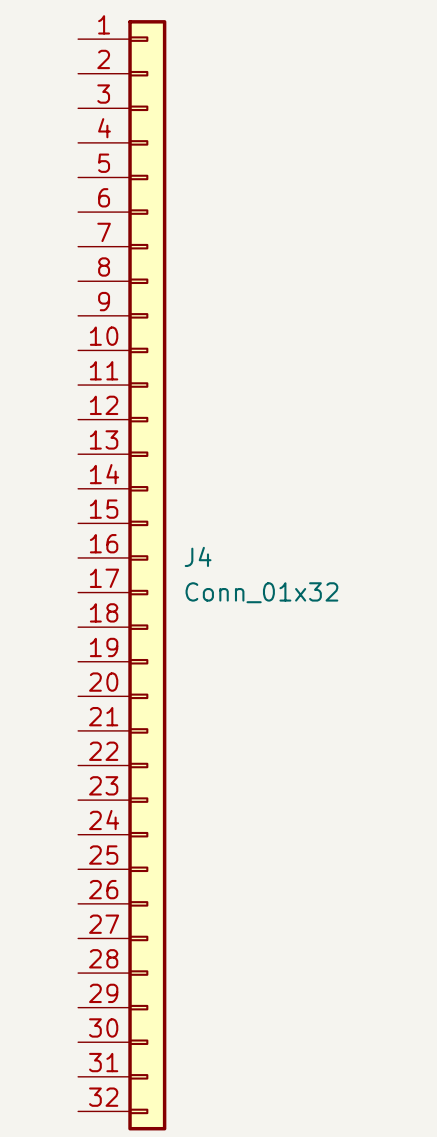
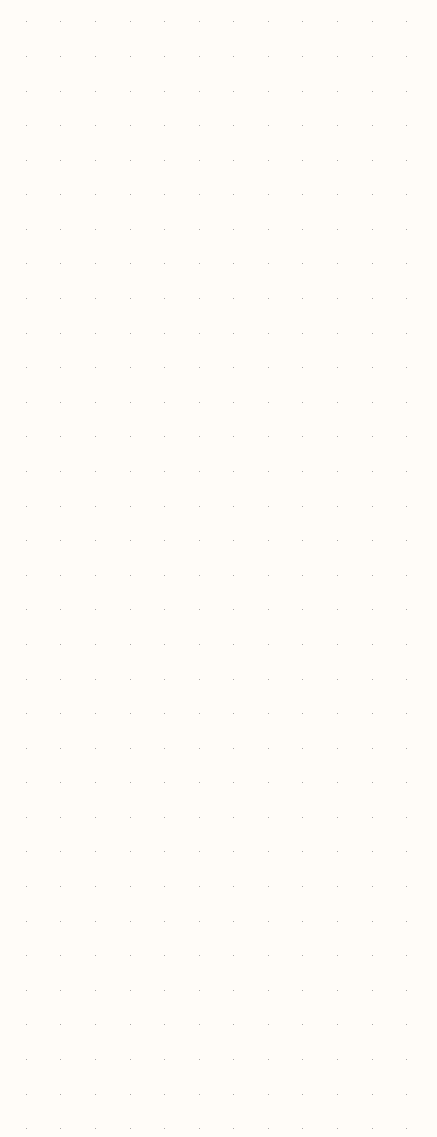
J4: Conn_01x32 (122, 575) -> none

